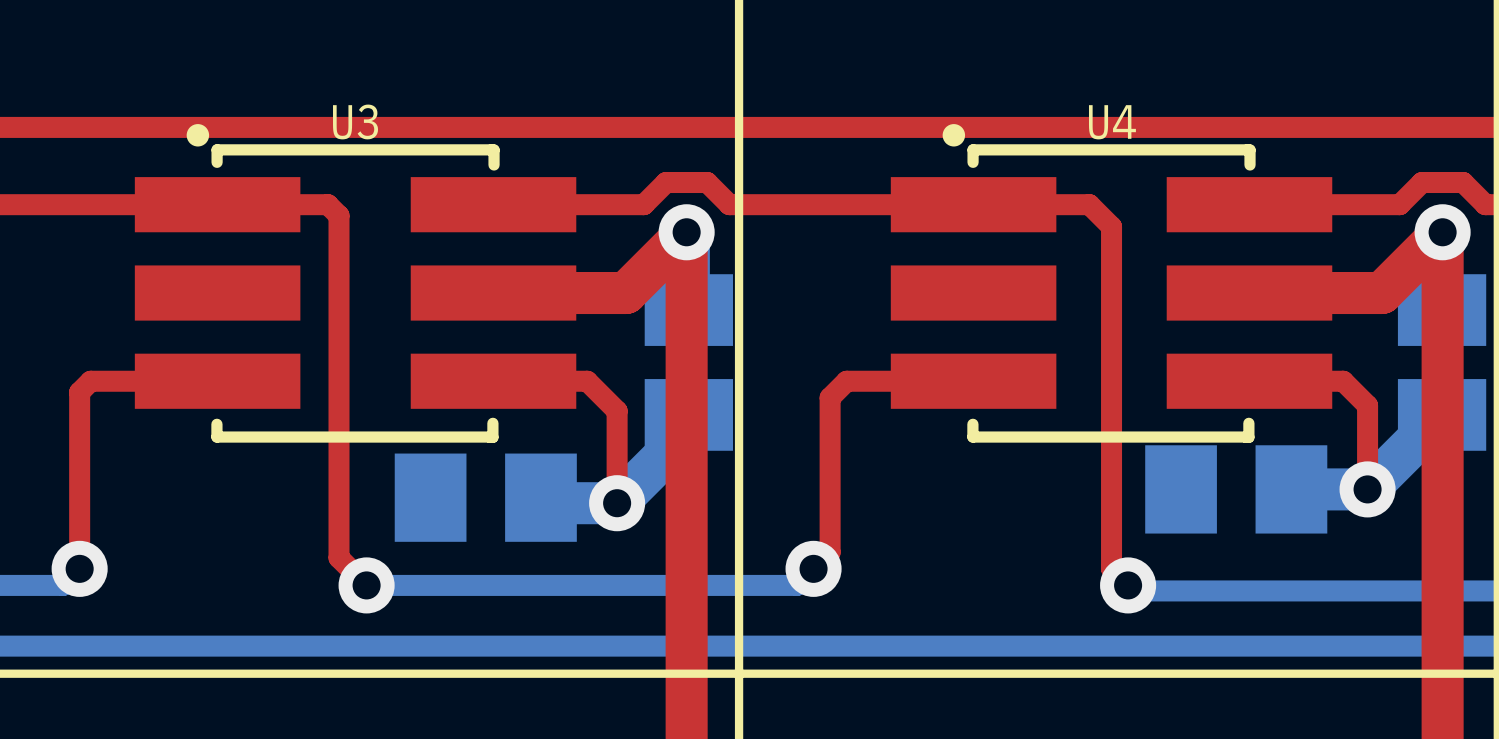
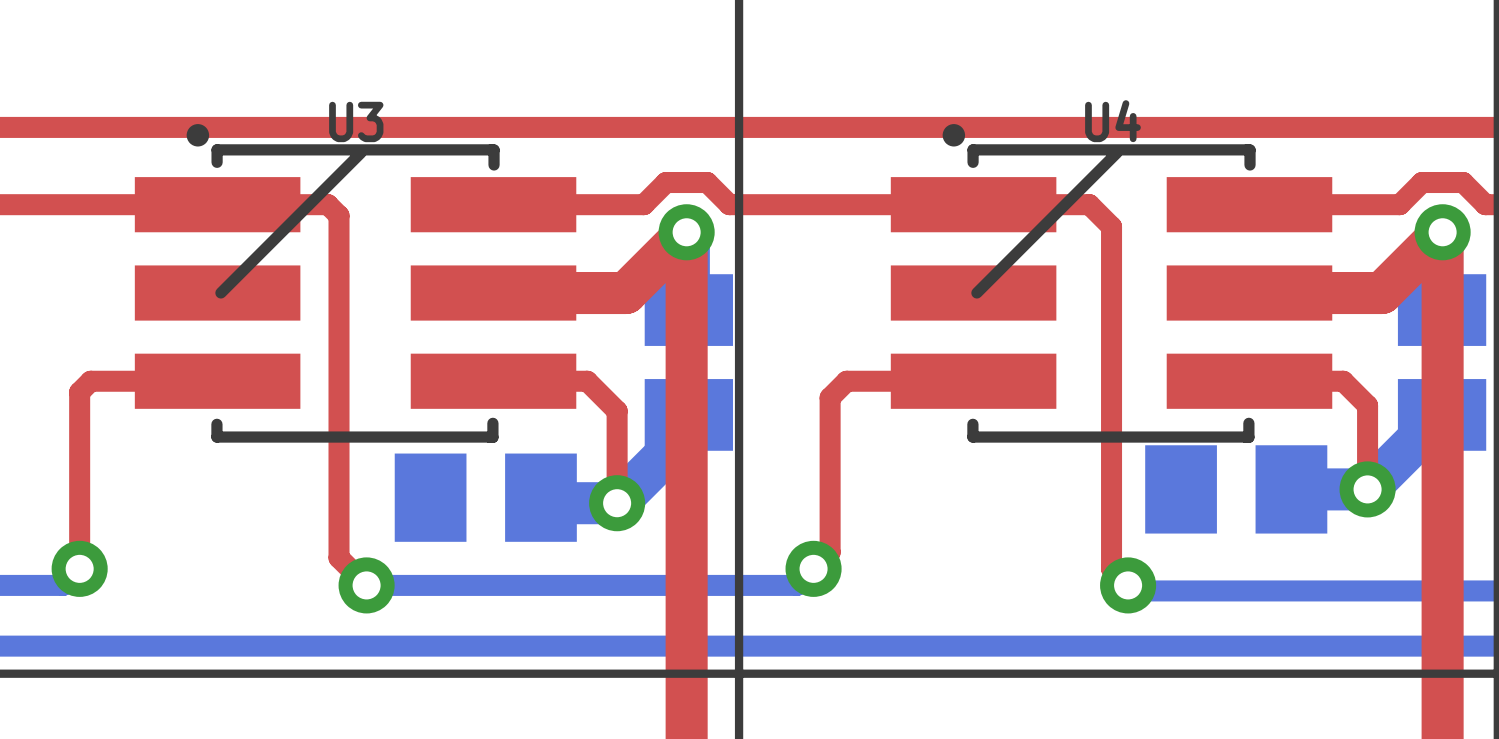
U3 footprint: [134, 124, 577, 443] -> [134, 124, 577, 443]
U4 footprint: [890, 124, 1333, 443] -> [890, 124, 1333, 443]

